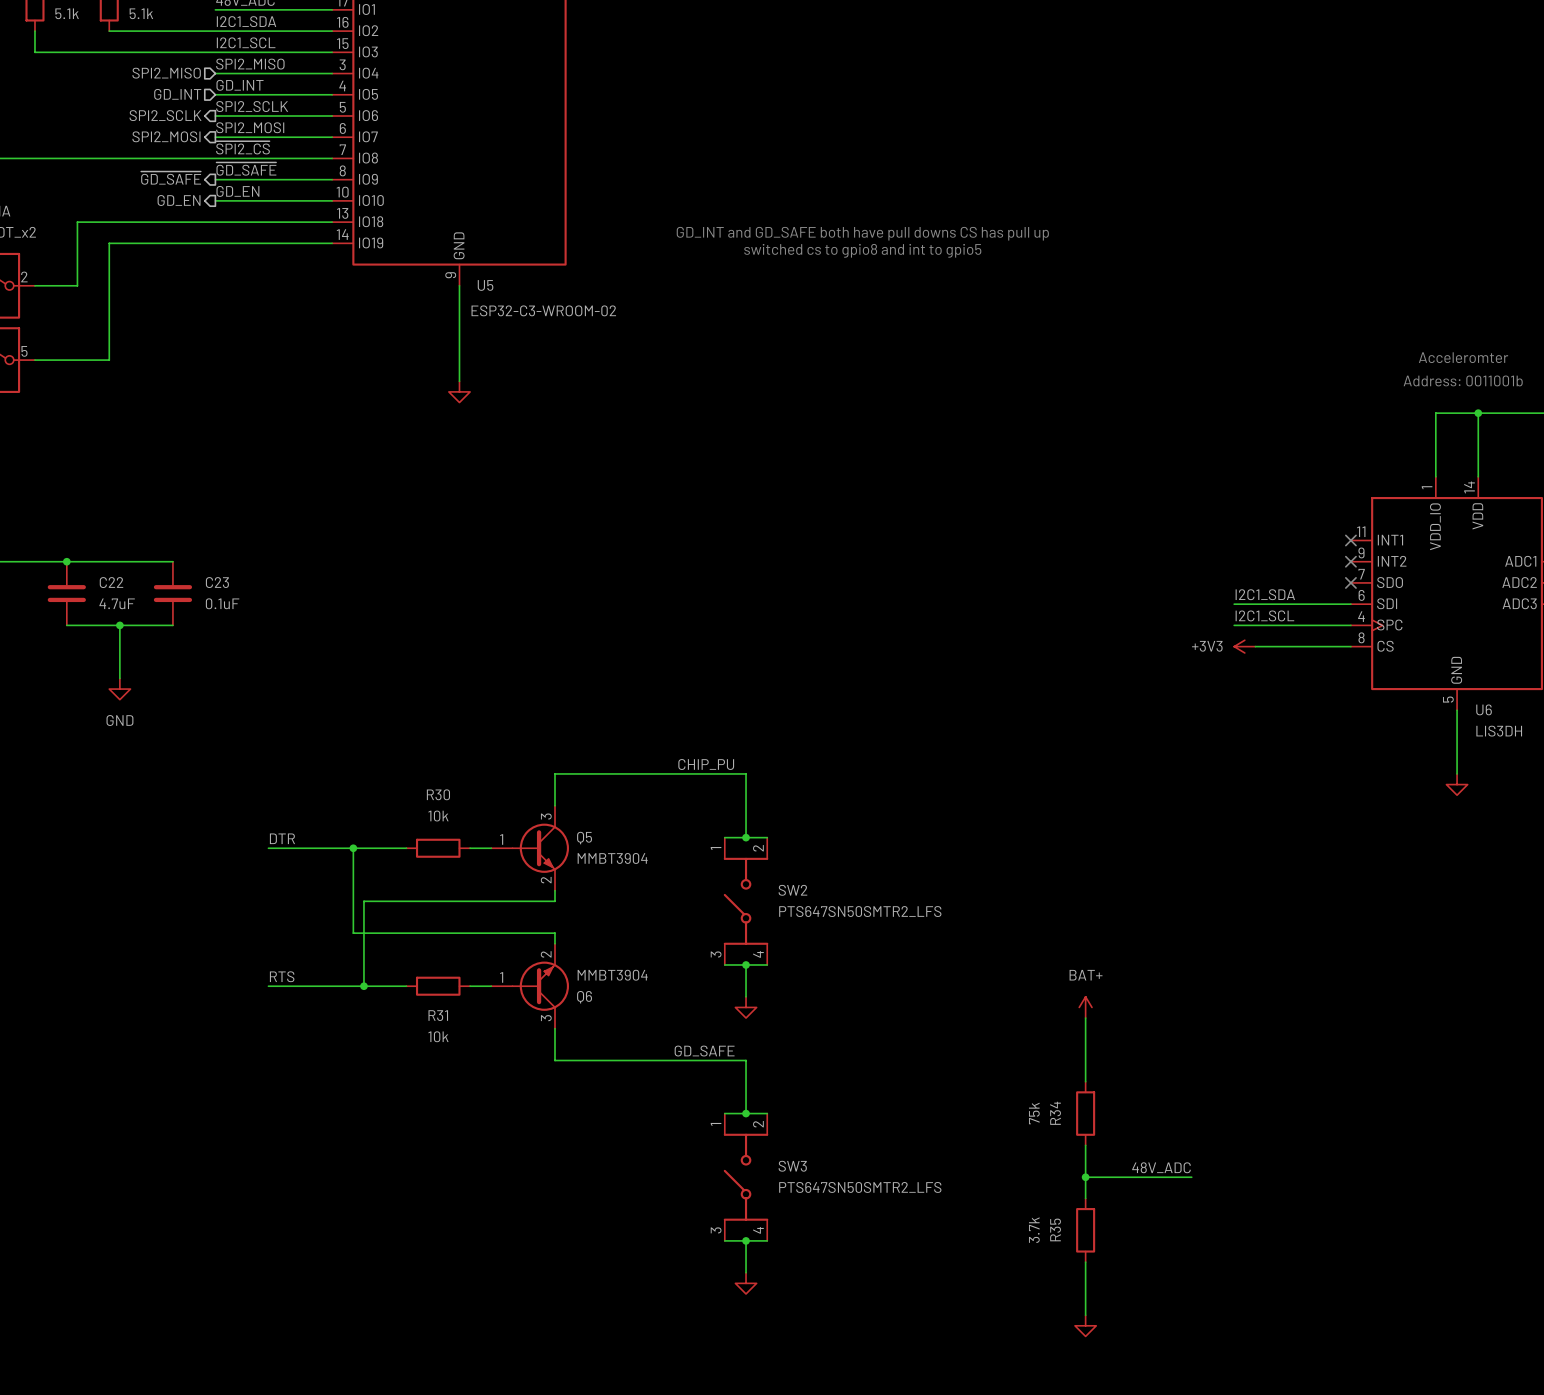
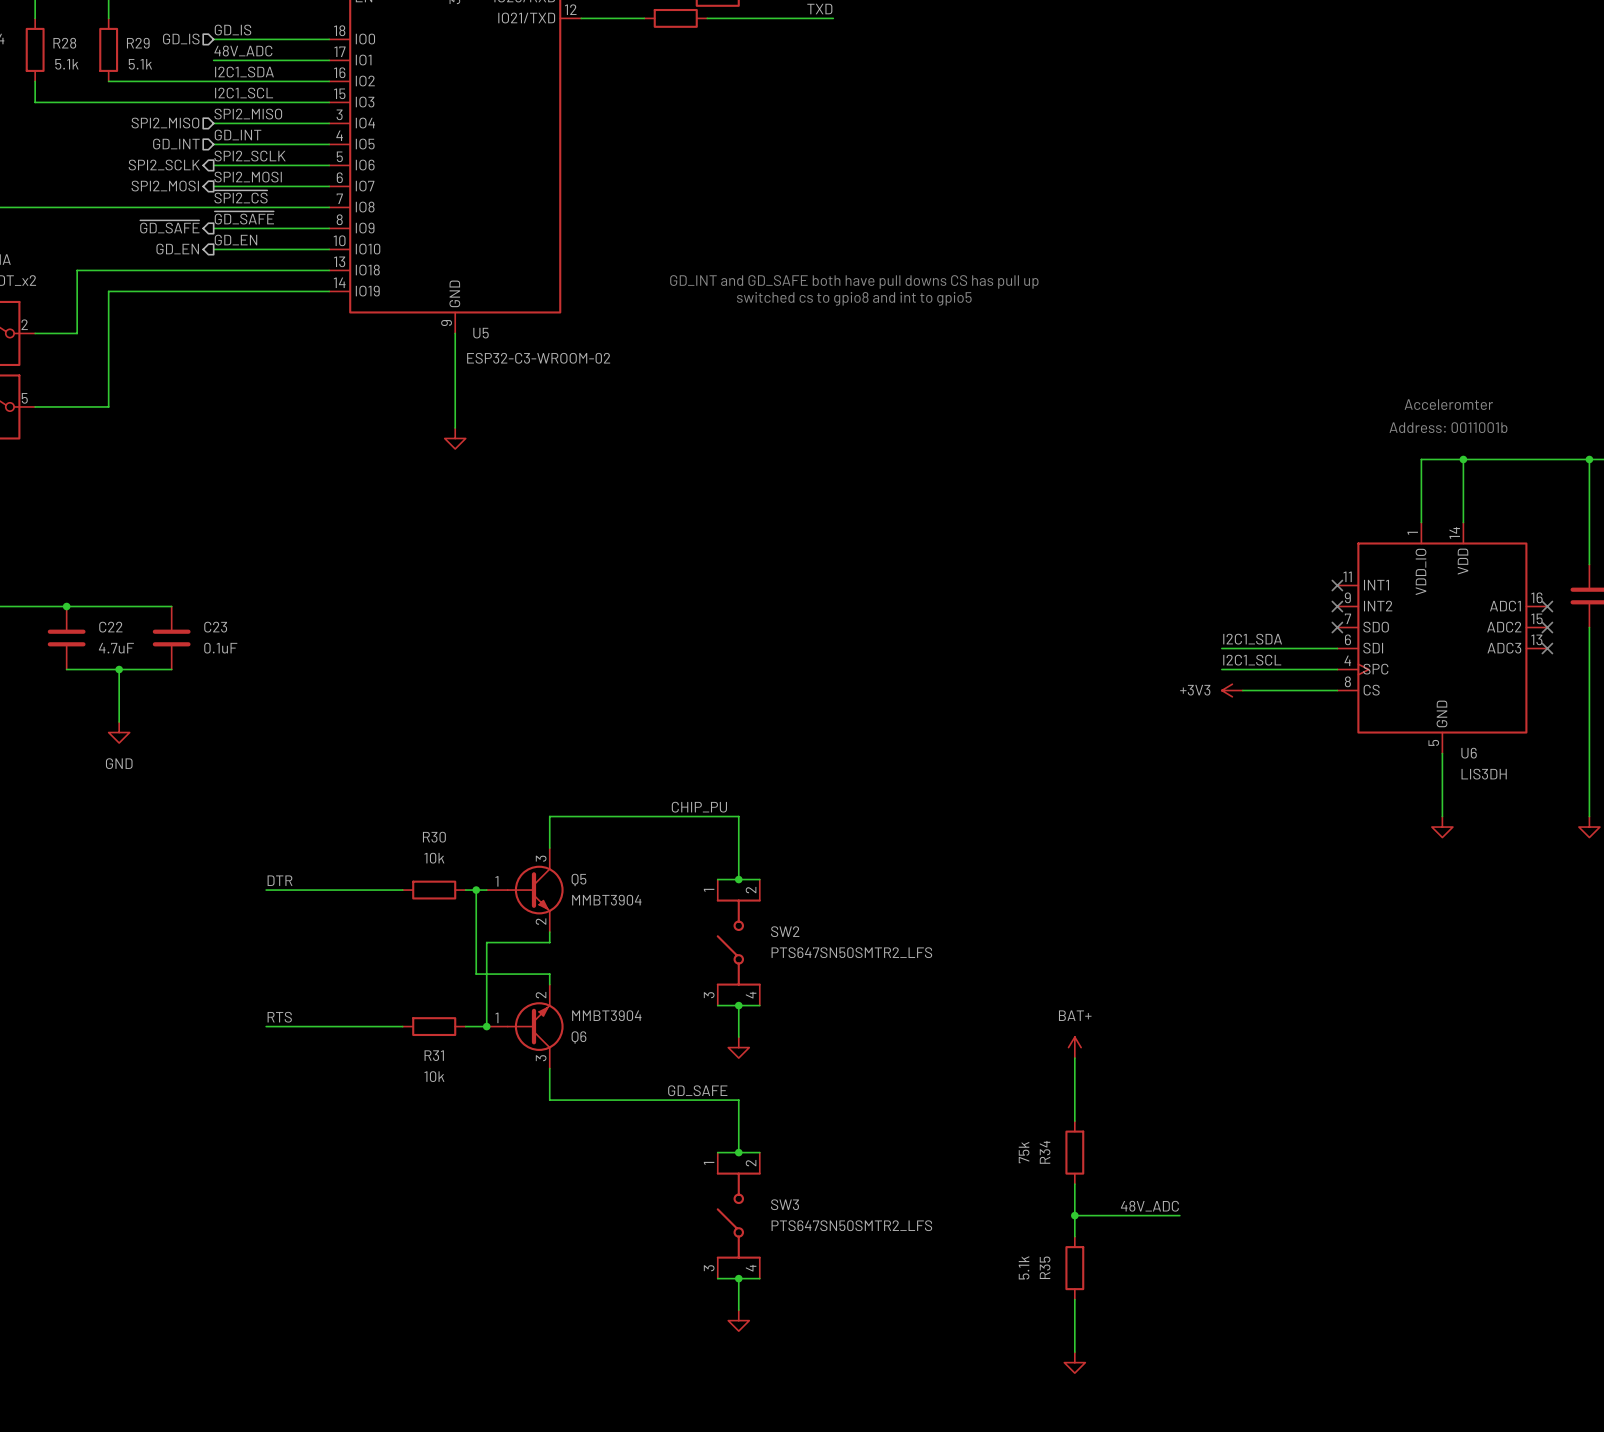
wire: (353, 848) (353, 933) (480, 933) -> (476, 890) (476, 974)
junction: (353, 848) -> none
junction: none -> (476, 890)
wire: (491, 901) (363, 901) (363, 986) -> (486, 942) (486, 1026)
junction: (363, 986) -> none
junction: none -> (486, 1026)
R35 value: 3.7k (1034, 1230) -> 5.1k (1024, 1267)

